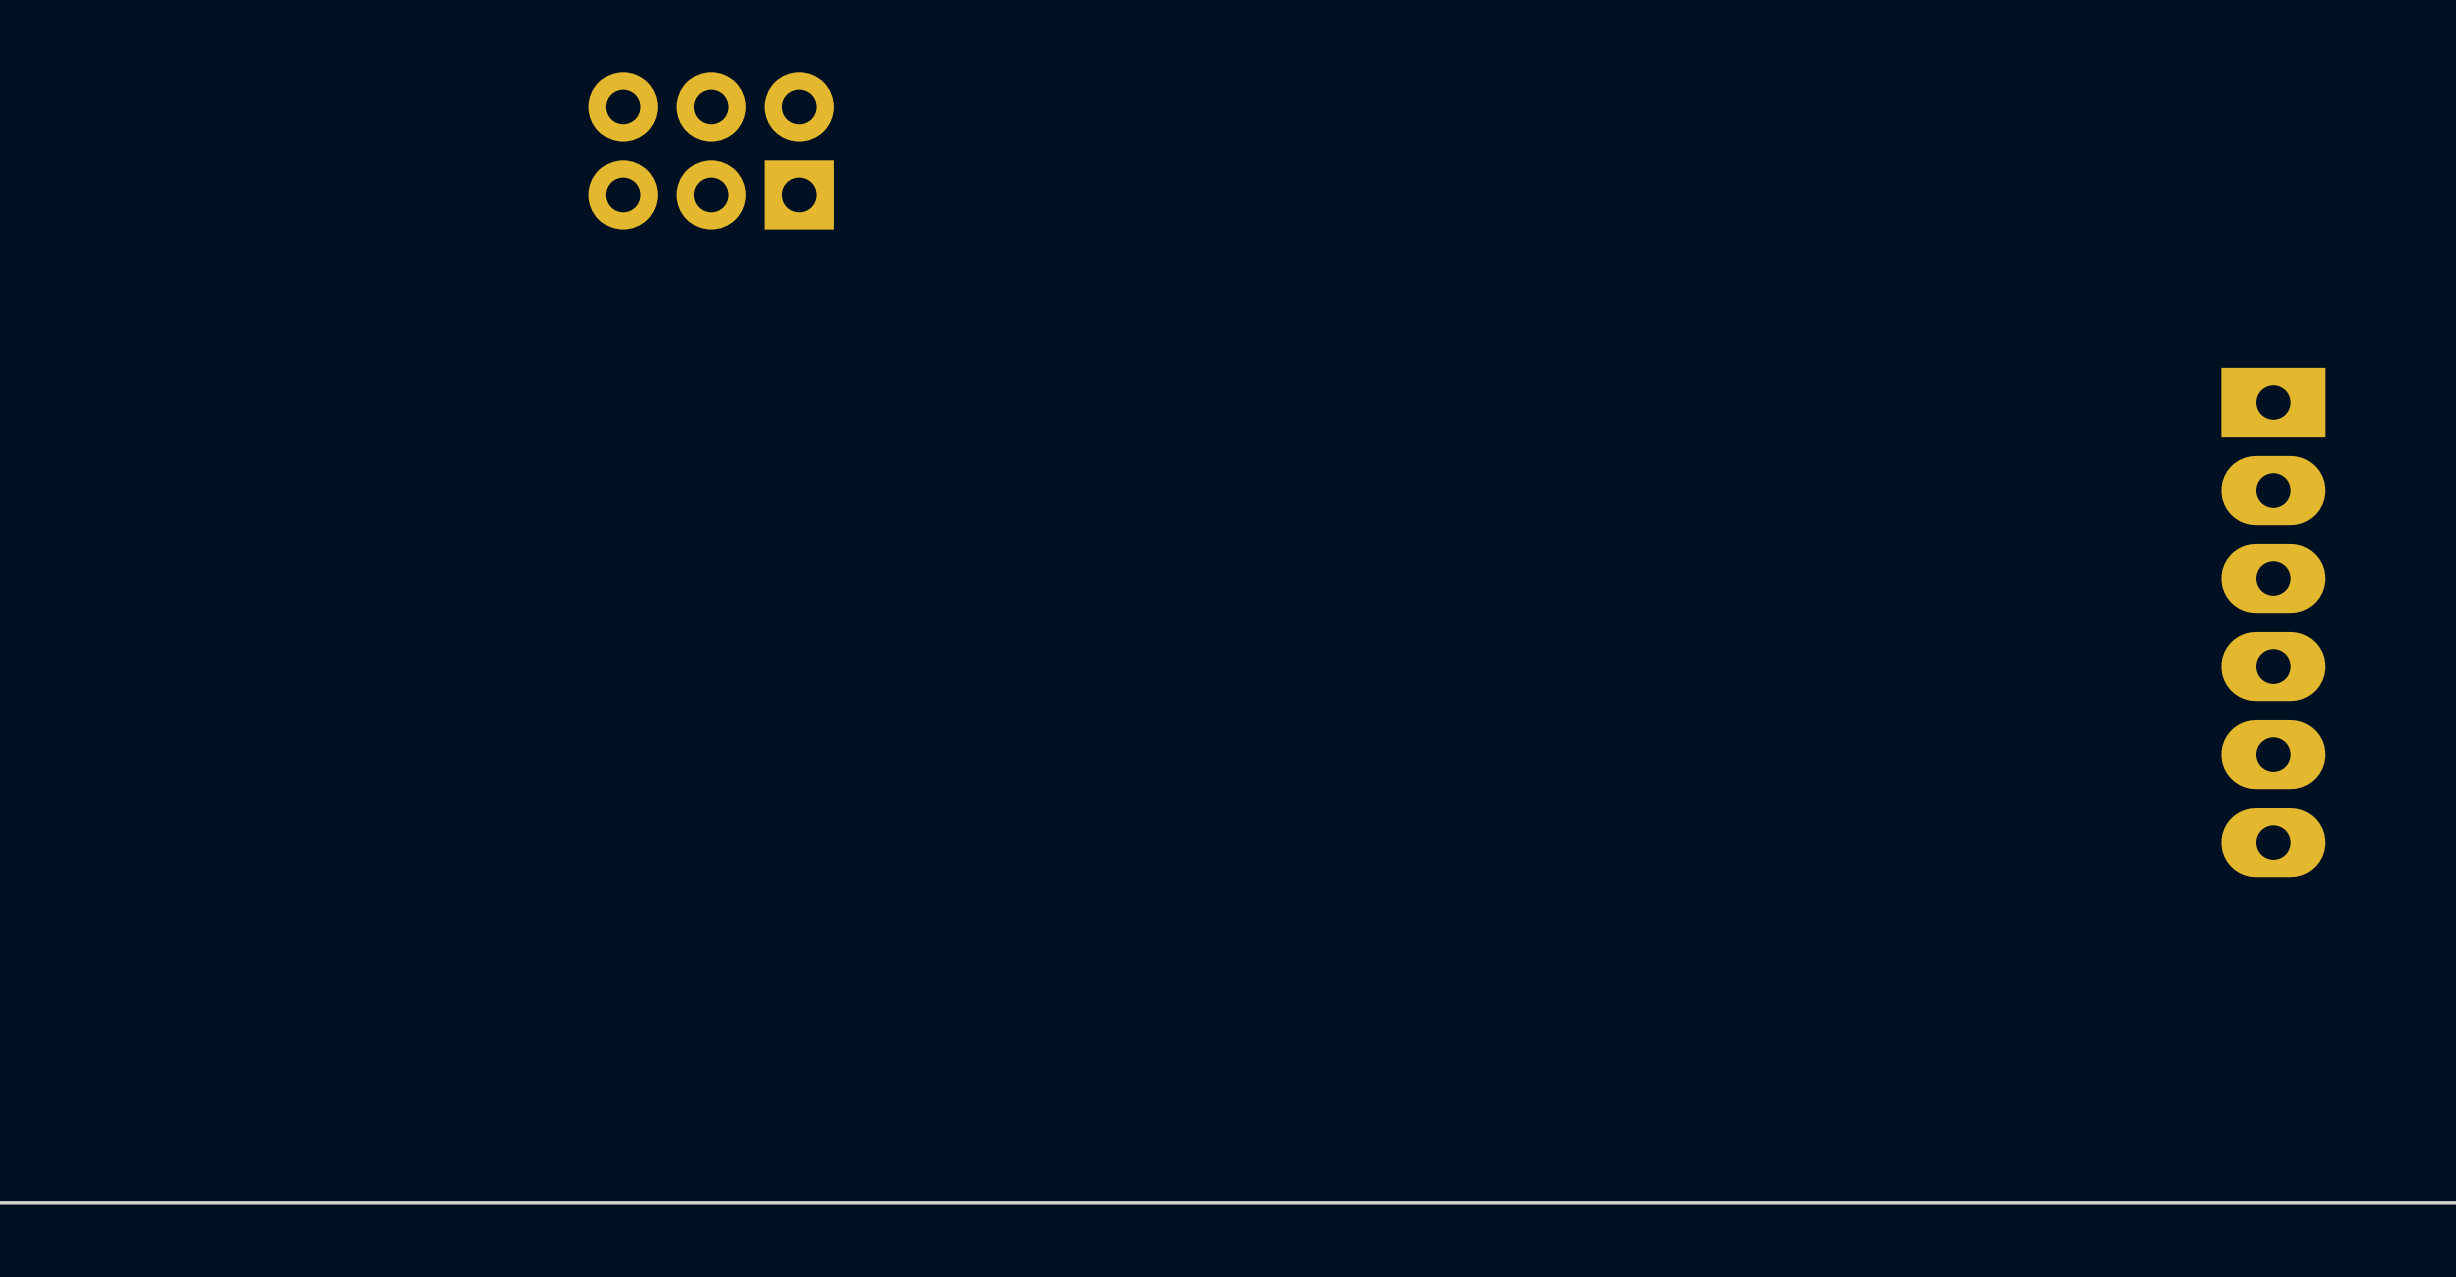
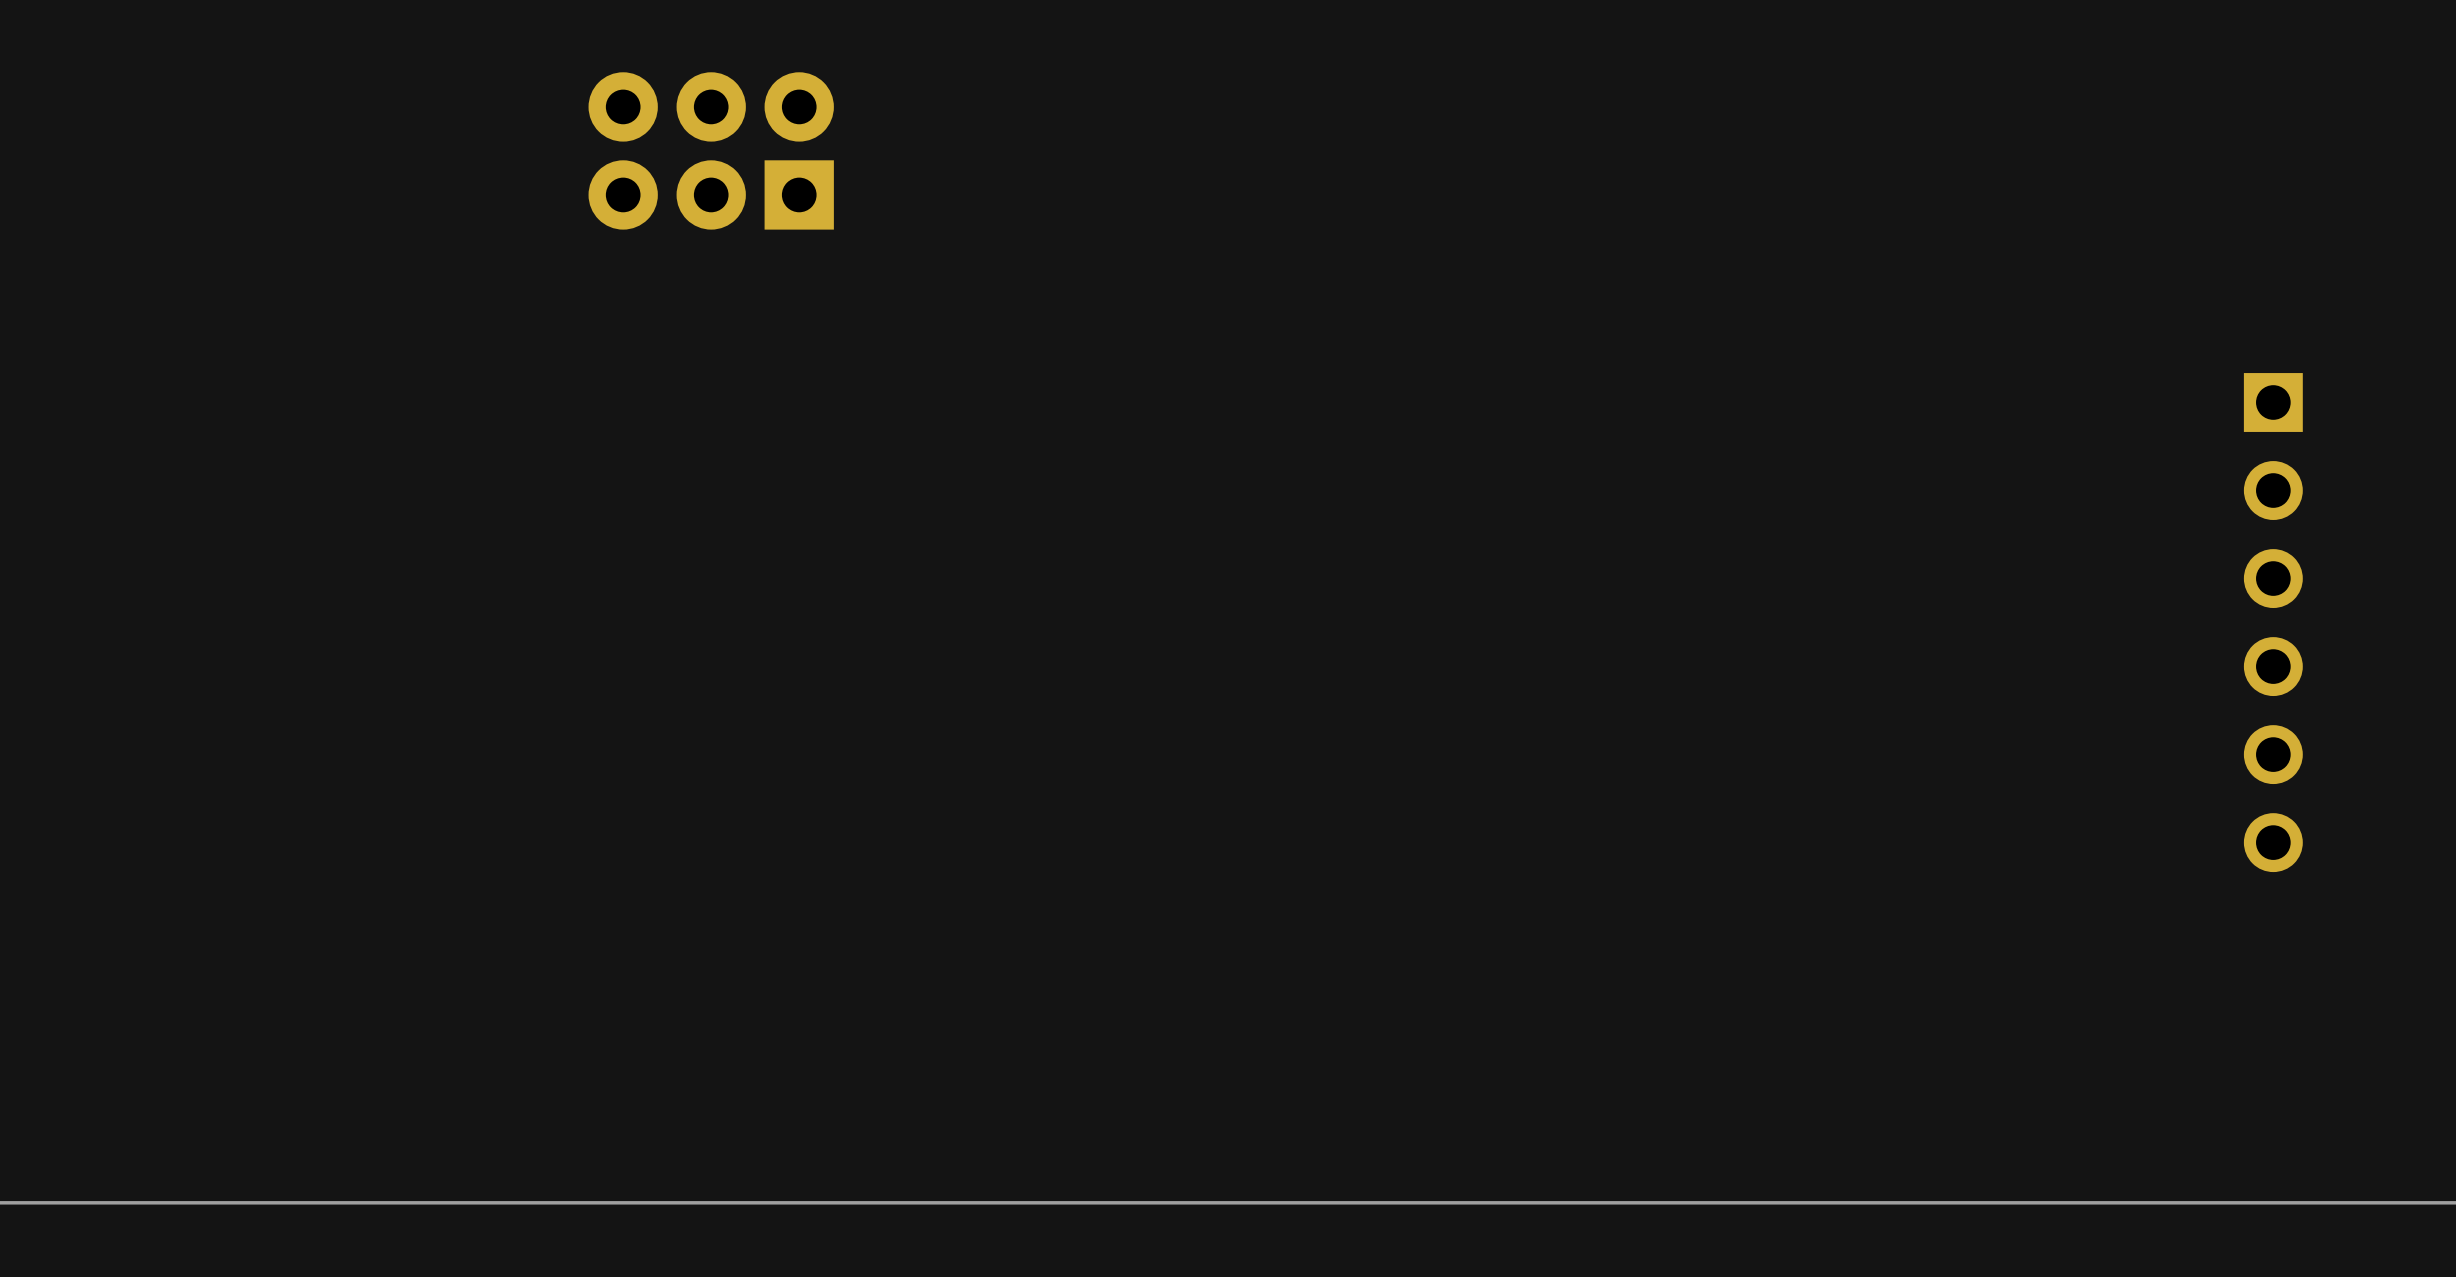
part footprint: [2221, 367, 2326, 878] -> [2243, 373, 2303, 873]

